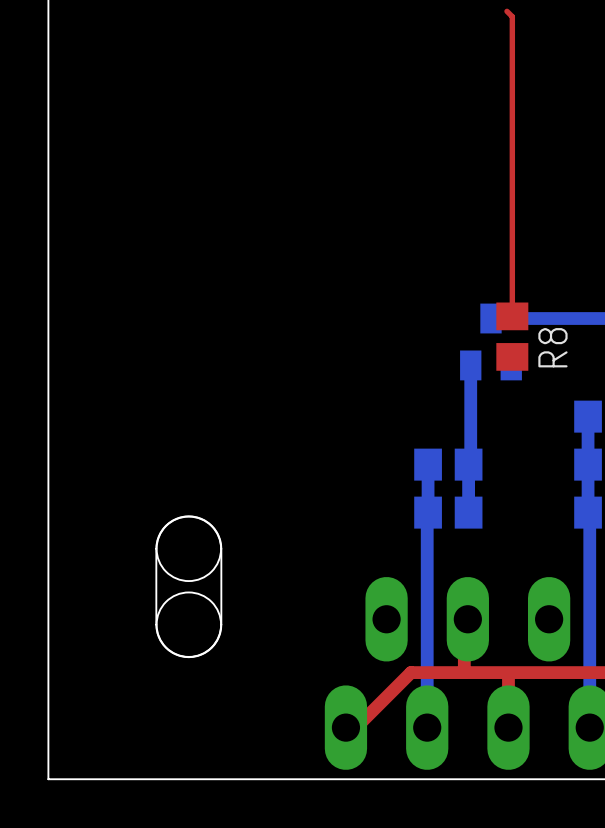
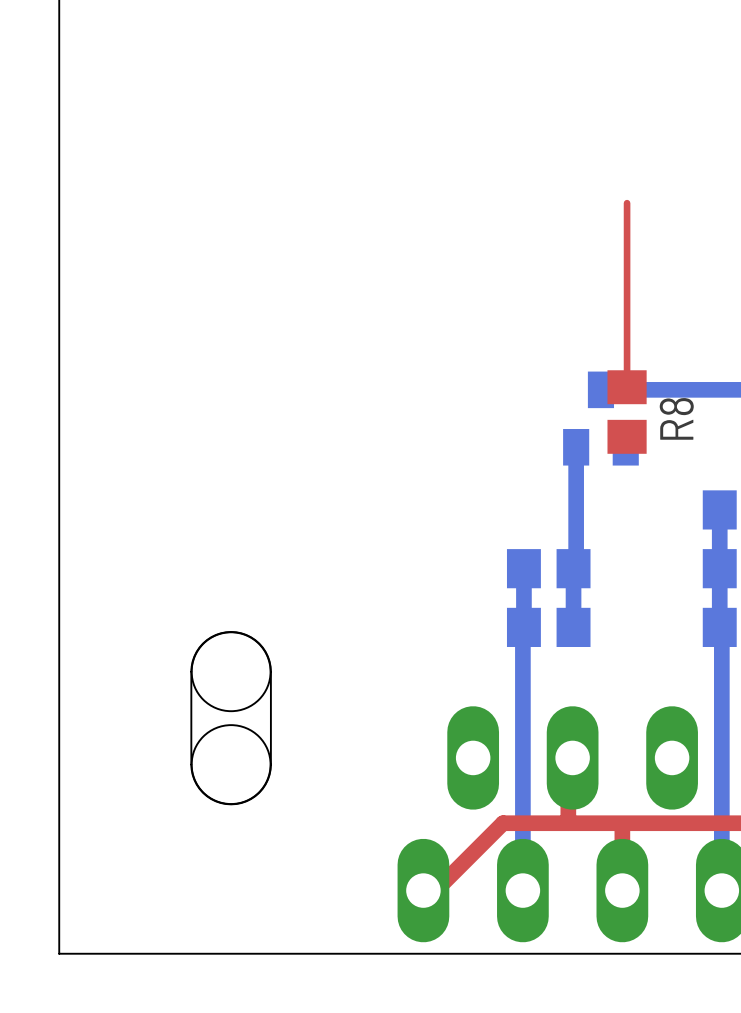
top track: (506, 11) (512, 16) (512, 166) -> none

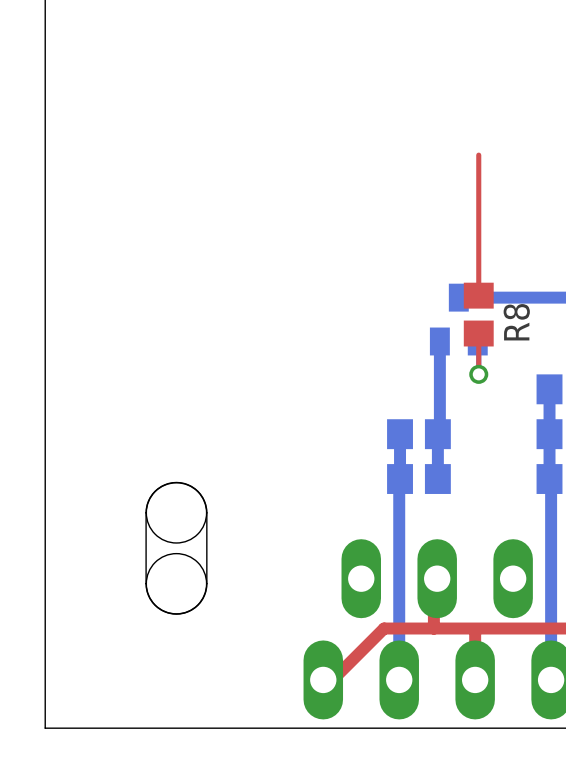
top track: none -> (478, 333) (478, 374)
via: none -> (478, 374)

